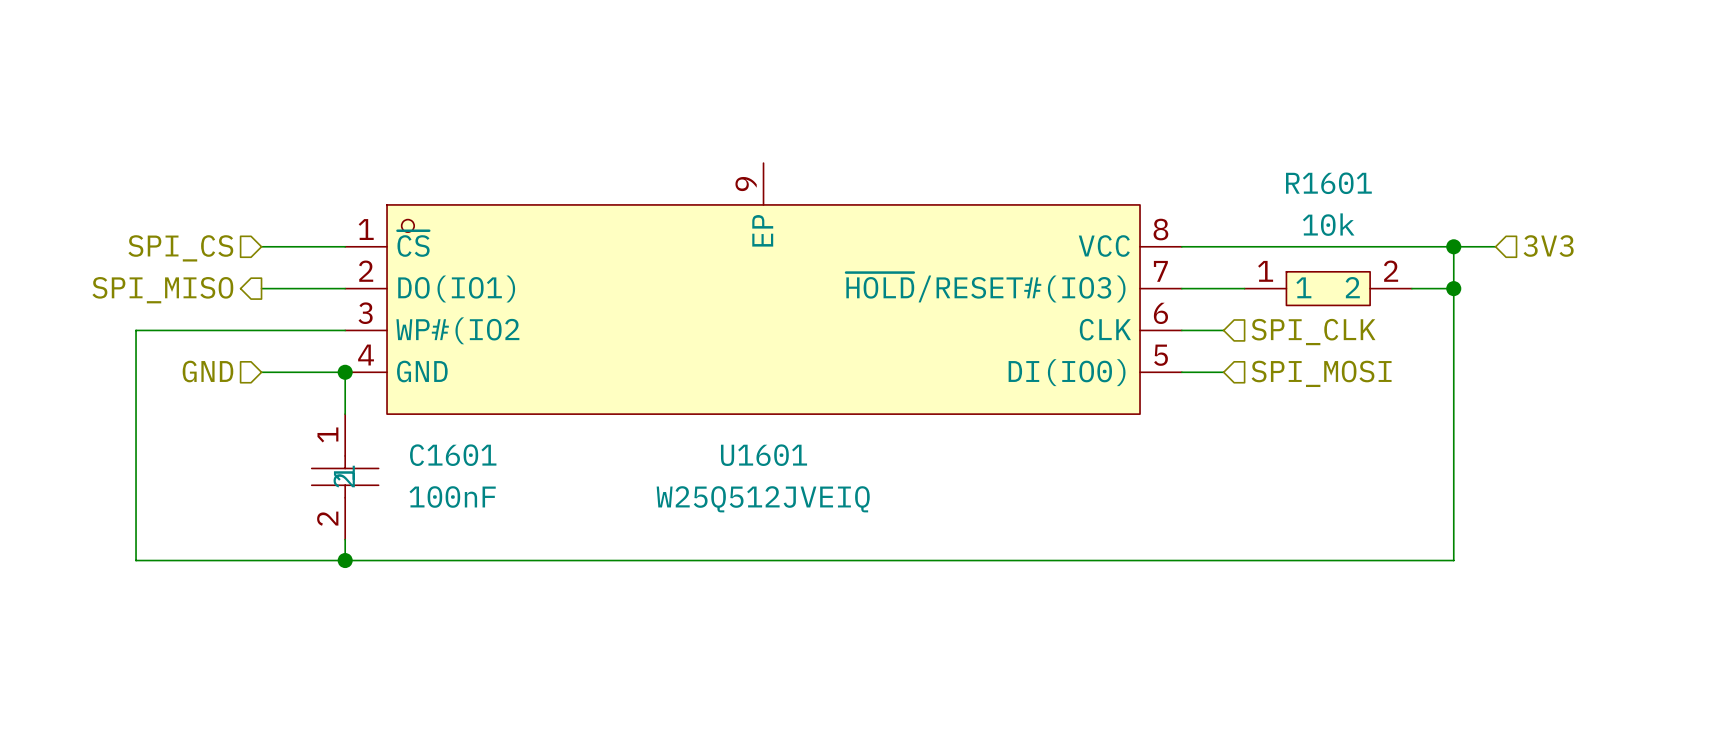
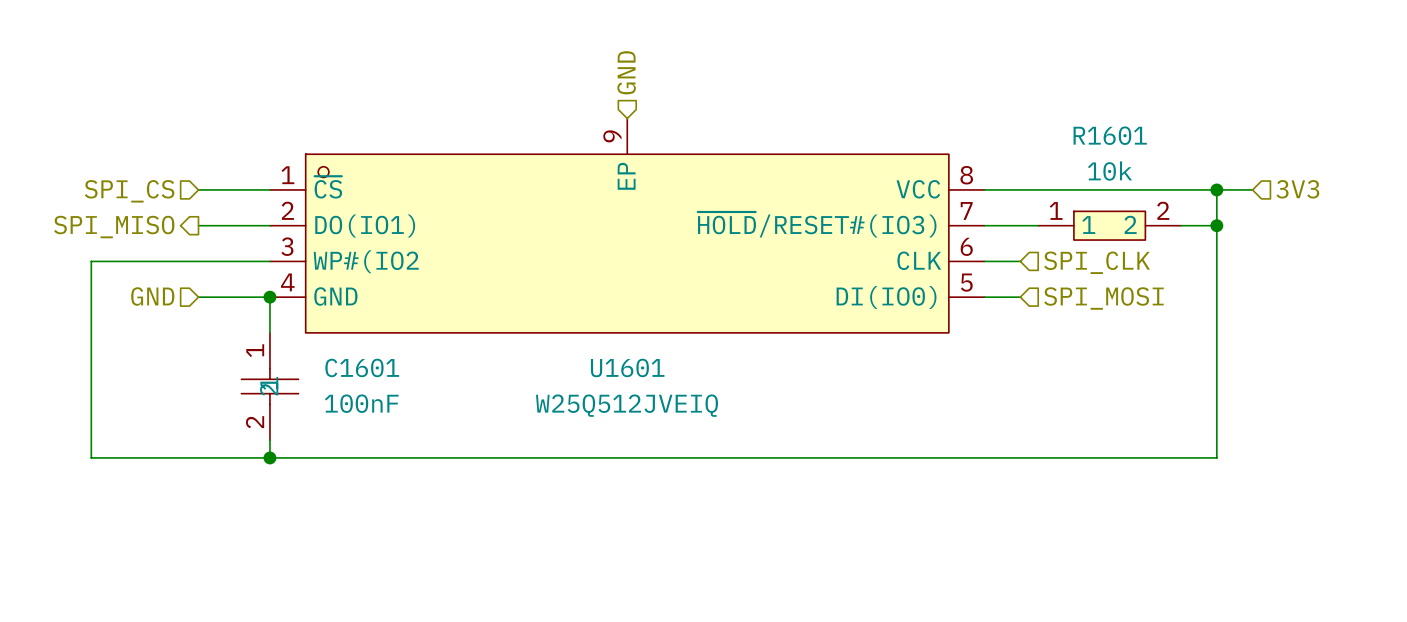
hierarchical label: none -> GND (626, 72)

